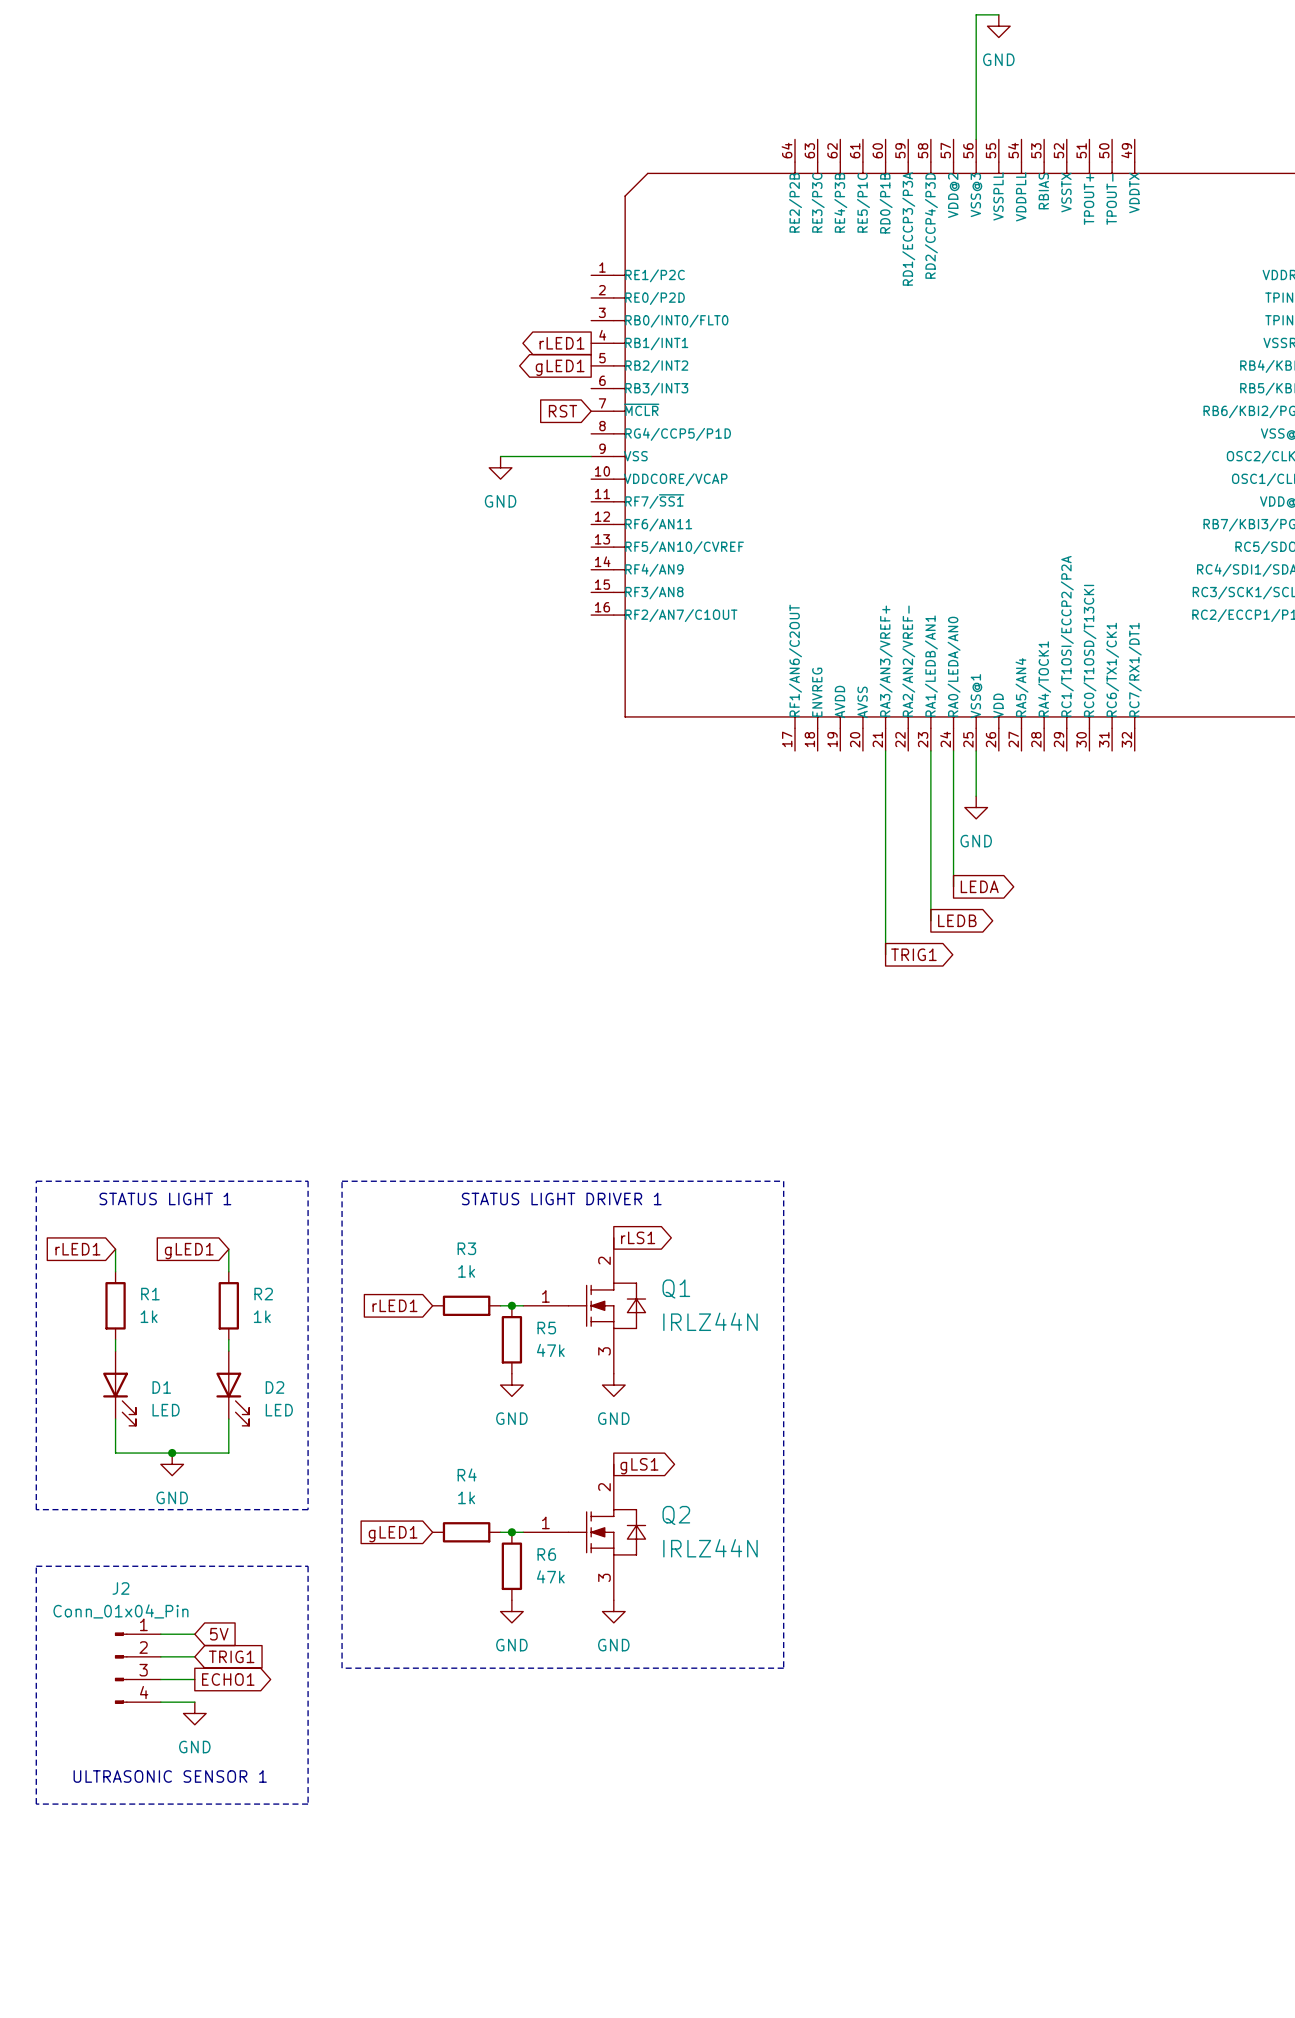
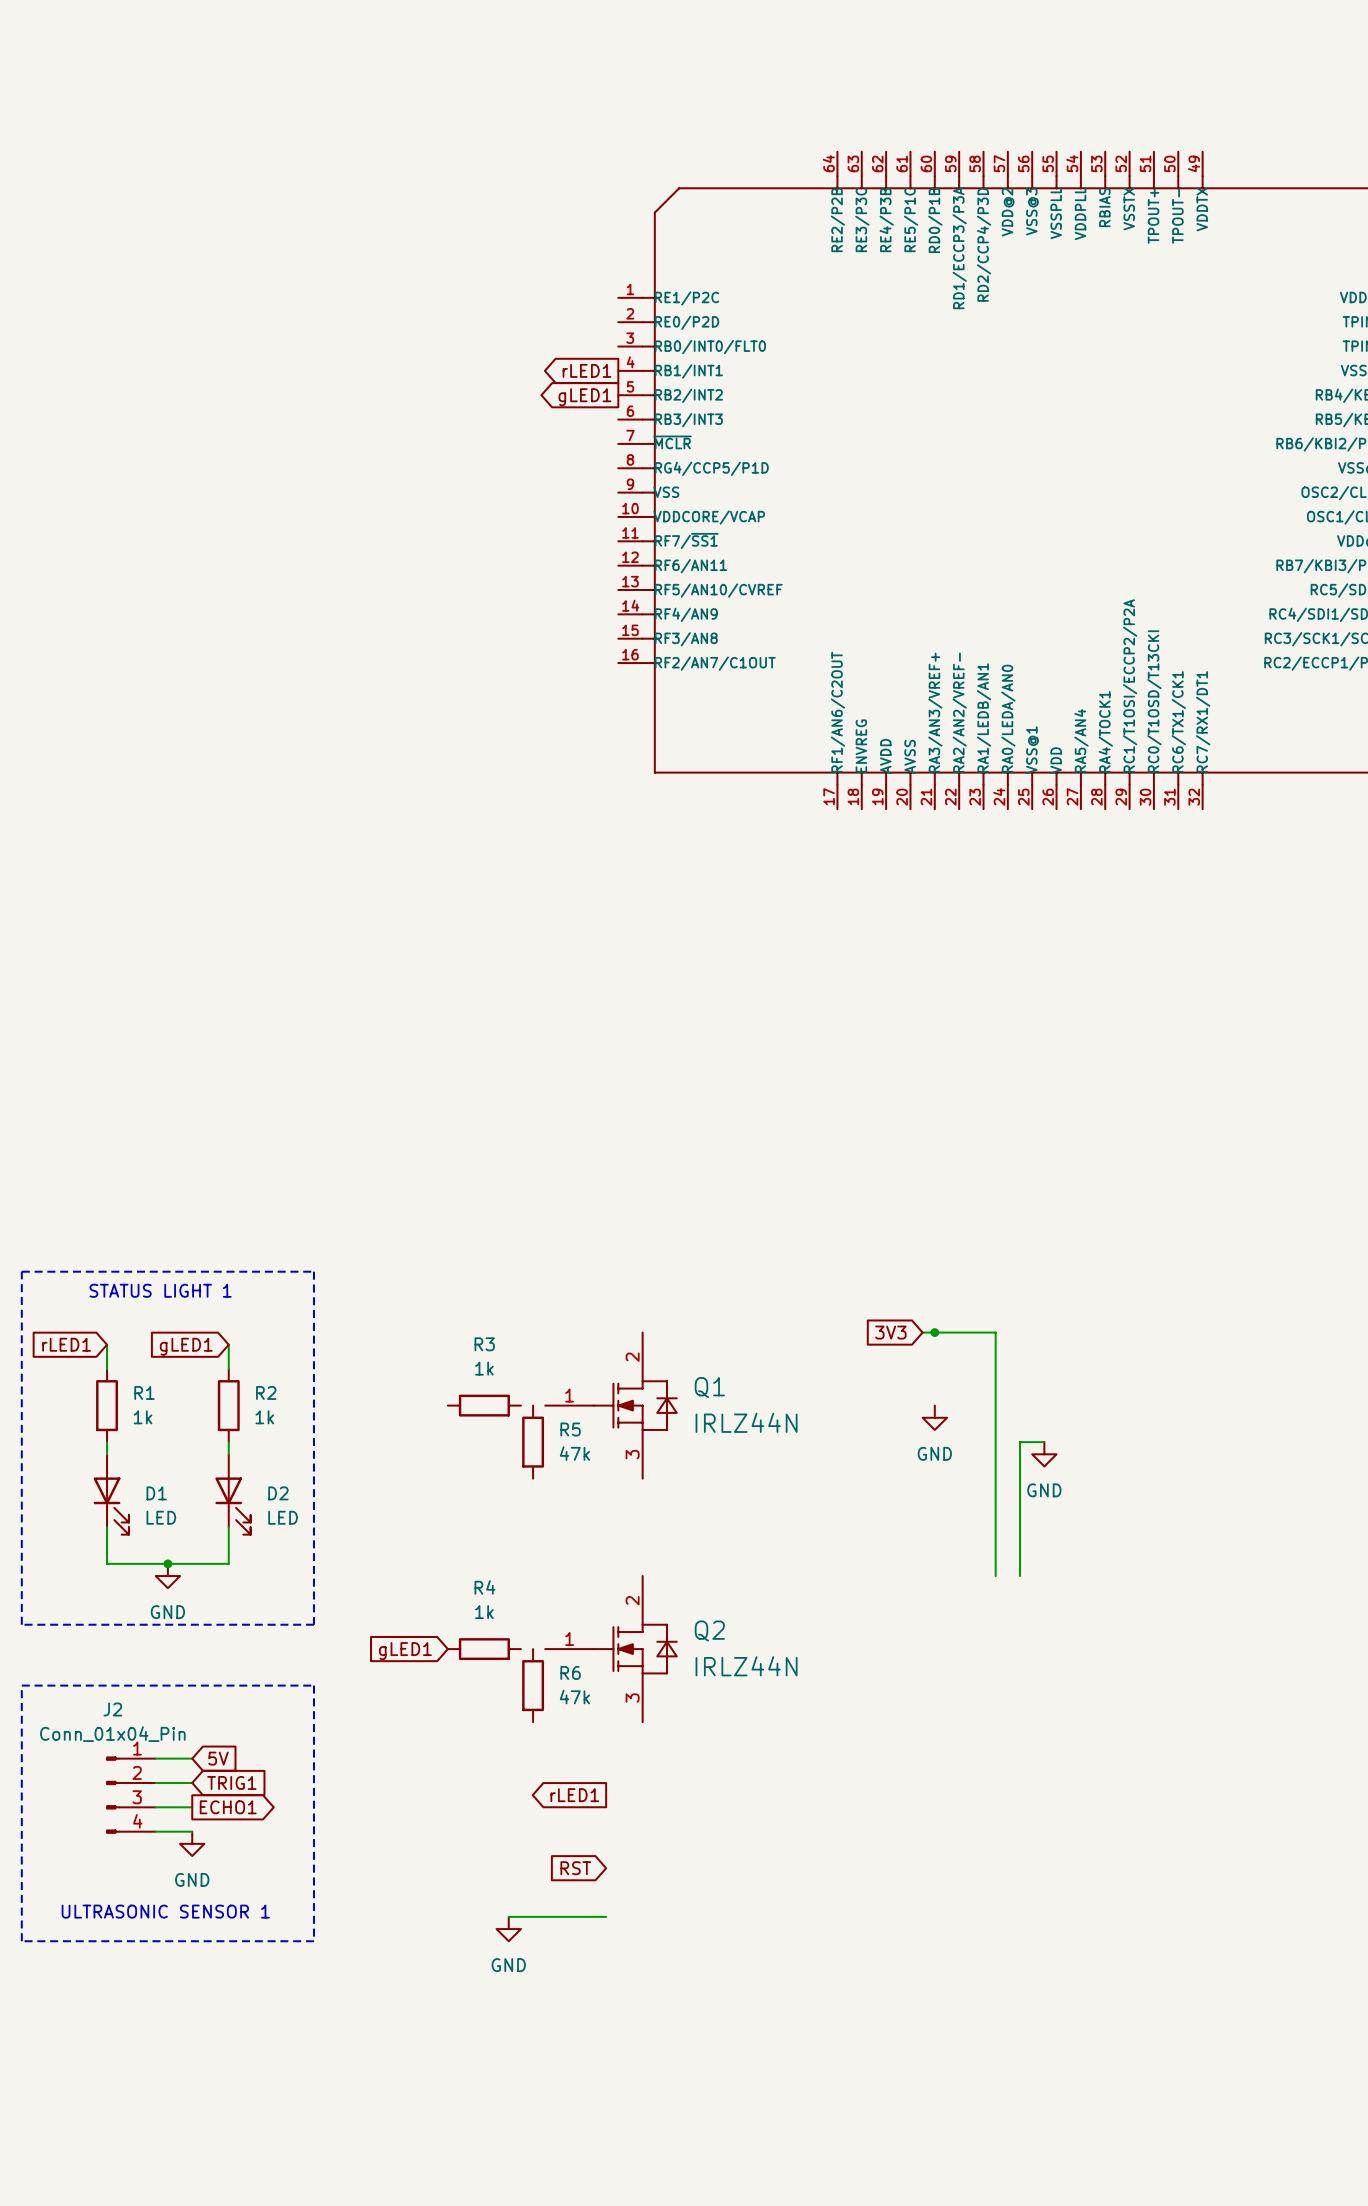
wire: (998, 14) (976, 14) (976, 139) -> none
power symbol: GND (998, 26) -> none
global label: RST (562, 411) -> none
wire: (500, 456) (591, 456) -> none
power symbol: GND (500, 467) -> none
wire: (885, 750) (885, 954) -> none
wire: (930, 750) (930, 920) -> none
wire: (953, 750) (953, 886) -> none
wire: (976, 750) (976, 796) -> none
power symbol: GND (976, 807) -> none
global label: LEDA (979, 886) -> none
global label: LEDB (957, 920) -> none
global label: TRIG1 (913, 954) -> none
line: (342, 1181) (783, 1181) (783, 1668) (342, 1668) (342, 1181) -> none
text: STATUS LIGHT DRIVER 1 (561, 1198) -> none
global label: rLS1 (638, 1237) -> none
global label: none -> 3V3 (890, 1332)
wire: none -> (922, 1332) (995, 1332) (995, 1576)
junction: none -> (934, 1332)
global label: rLED1 (395, 1305) -> none
wire: (500, 1305) (523, 1305) -> none
junction: (511, 1305) -> none
power symbol: none -> GND (934, 1417)
wire: none -> (1044, 1442) (1020, 1442) (1020, 1576)
power symbol: none -> GND (1044, 1454)
power symbol: GND (511, 1385) -> none
power symbol: GND (613, 1385) -> none
global label: gLS1 (639, 1466) -> none
wire: (500, 1532) (523, 1532) -> none
junction: (511, 1532) -> none
power symbol: GND (511, 1611) -> none
power symbol: GND (613, 1611) -> none
global label: none -> rLED1 (574, 1795)
global label: none -> RST (575, 1868)
wire: none -> (508, 1916) (606, 1916)
power symbol: none -> GND (508, 1929)

